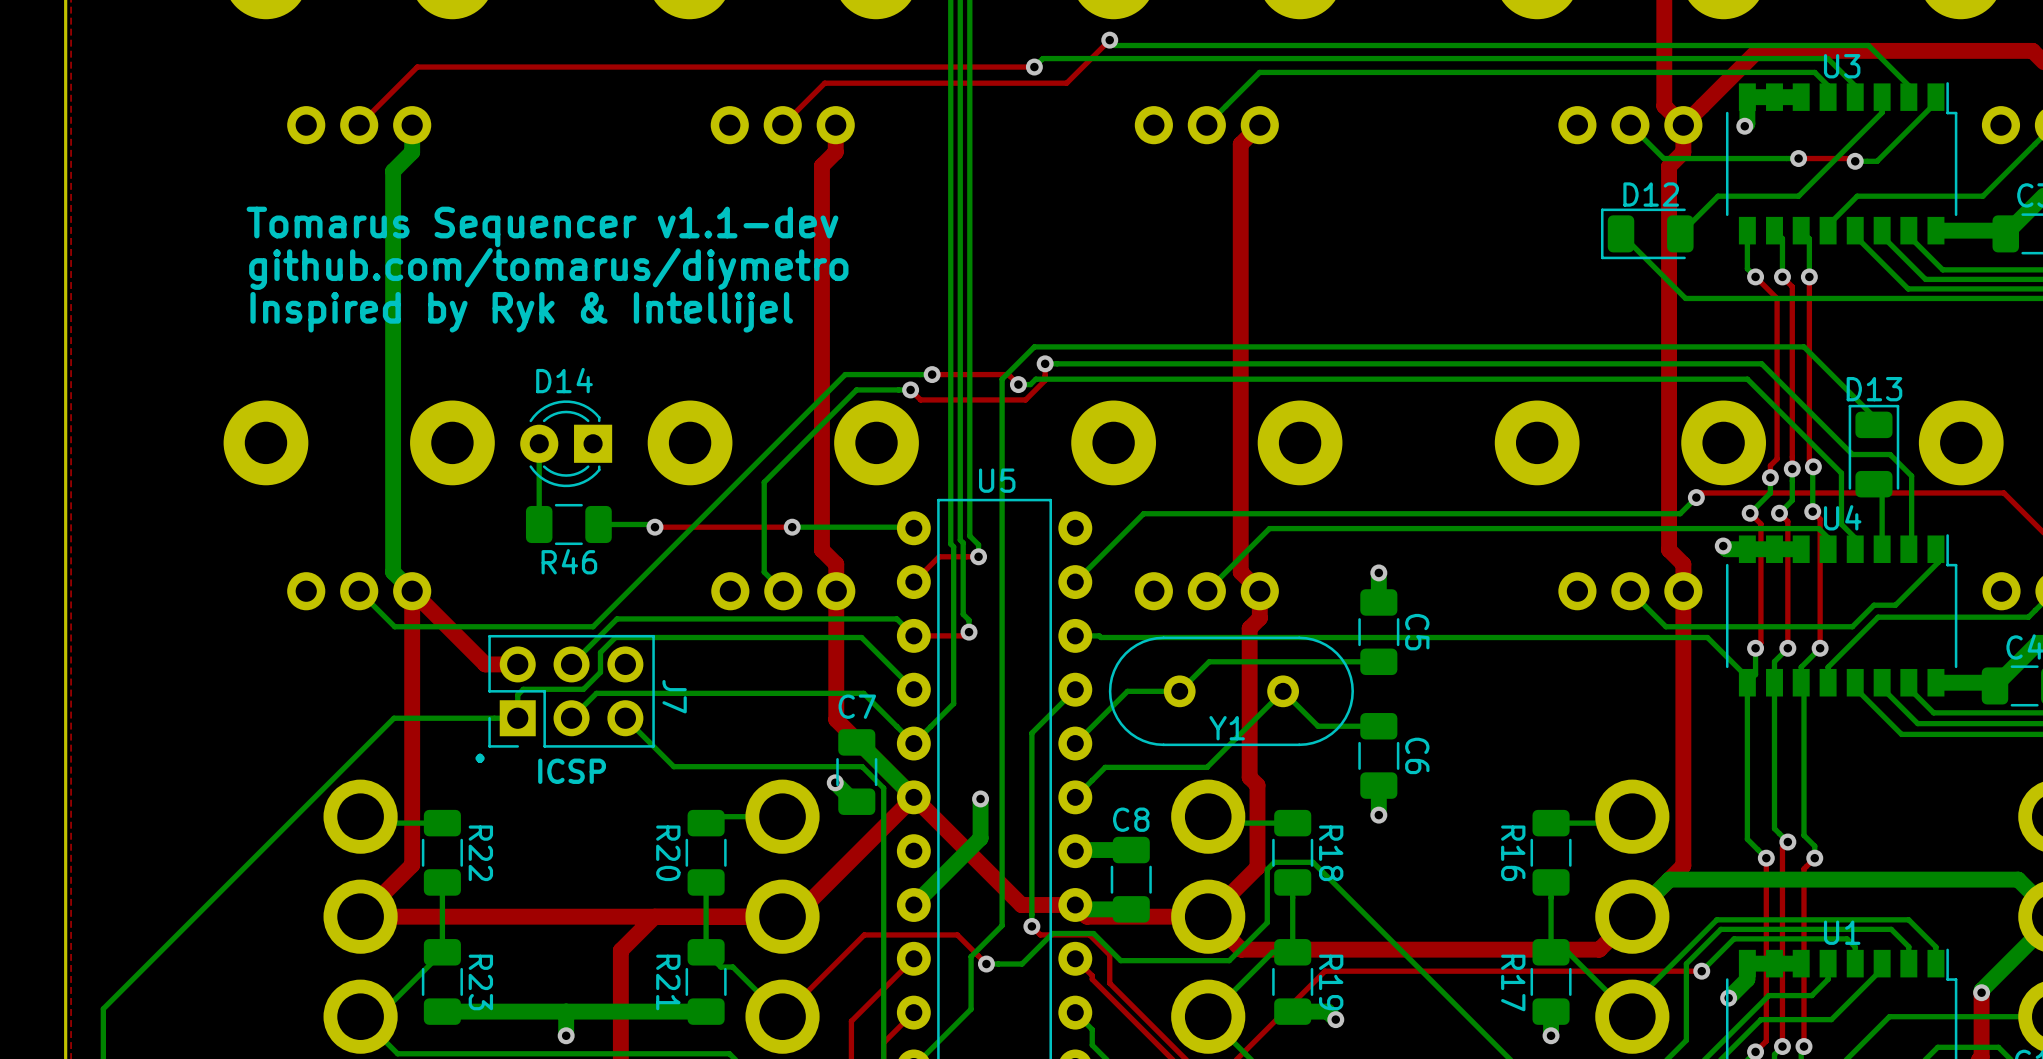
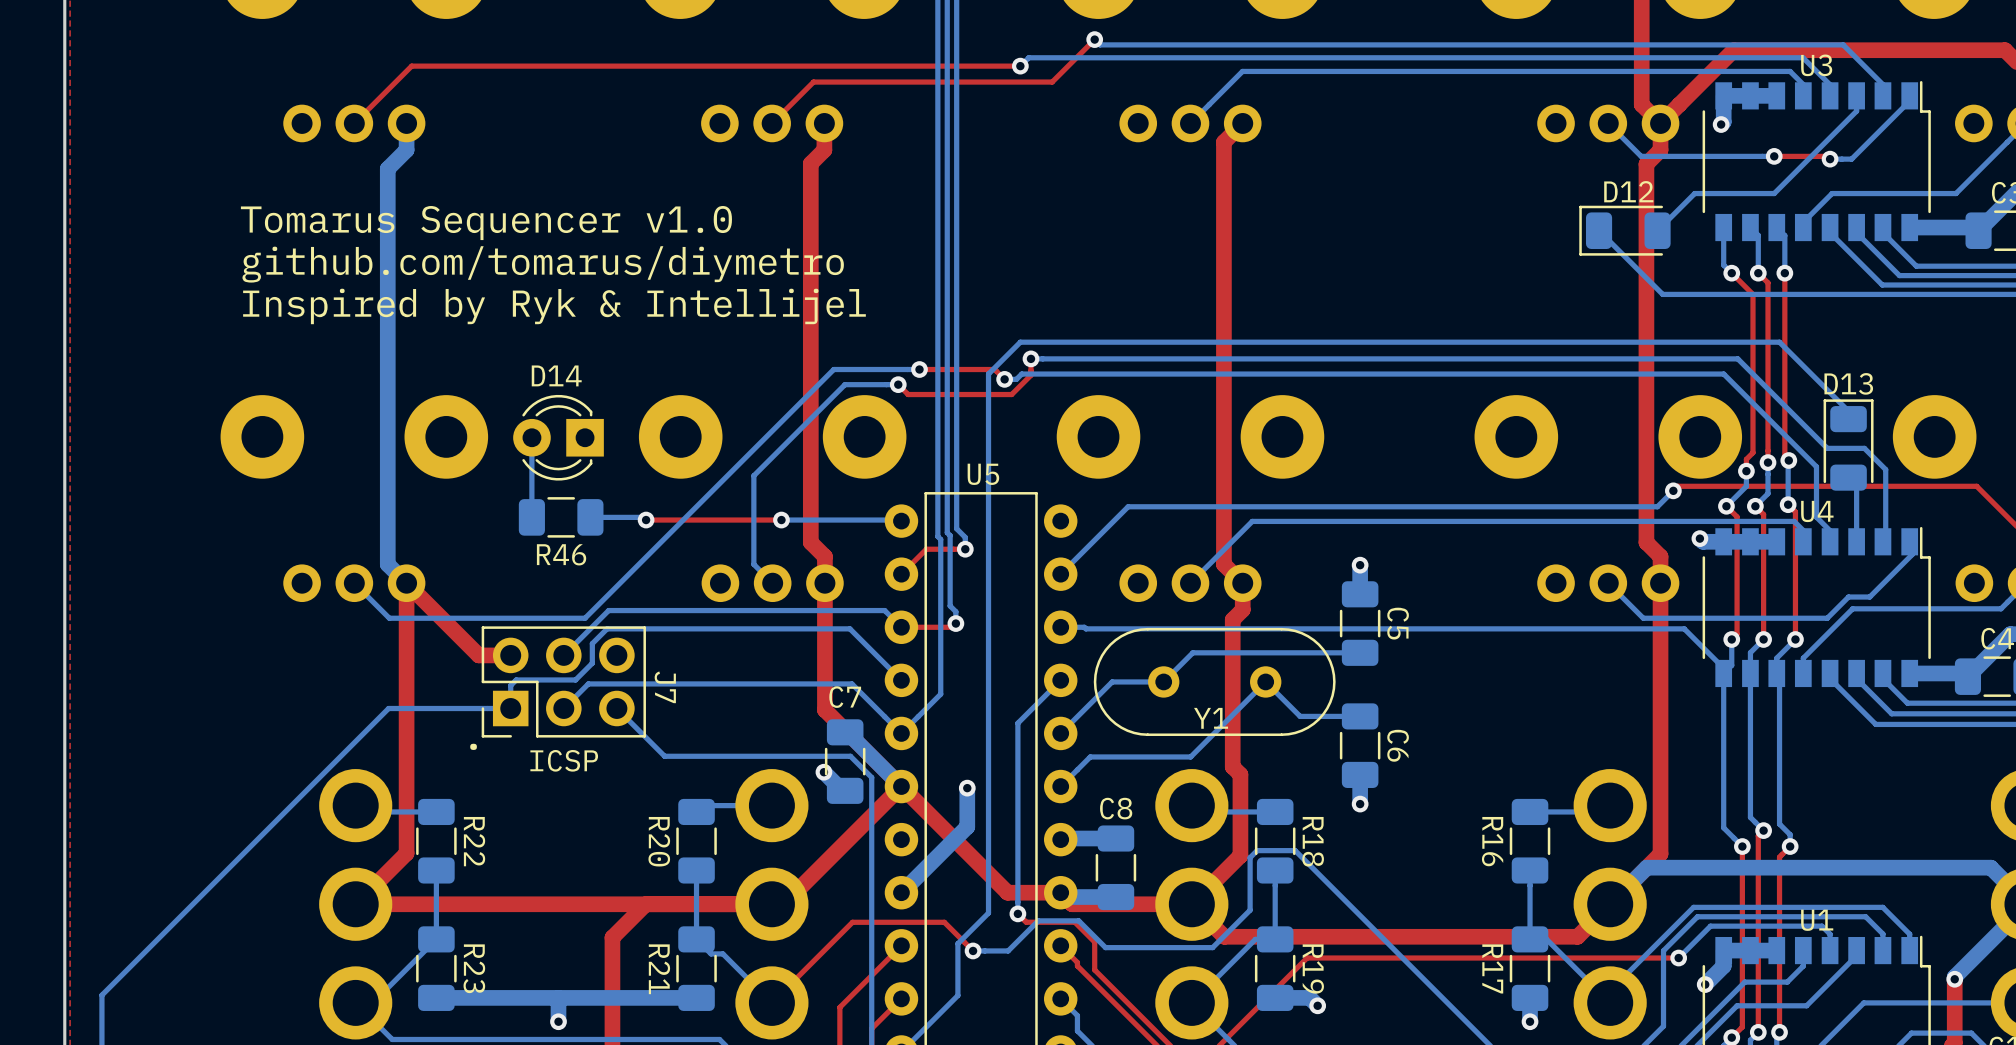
text: Tomarus Sequencer v1.1-dev (542, 226) -> Tomarus Sequencer v1.0 (486, 223)

